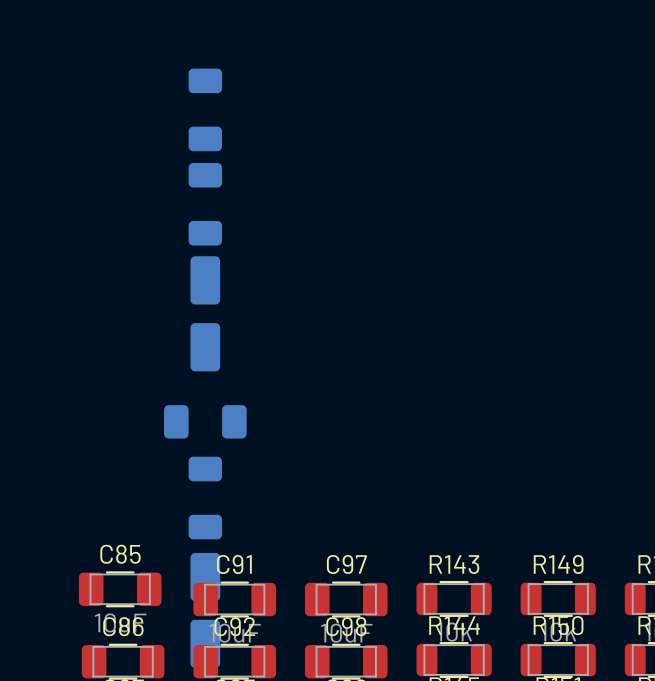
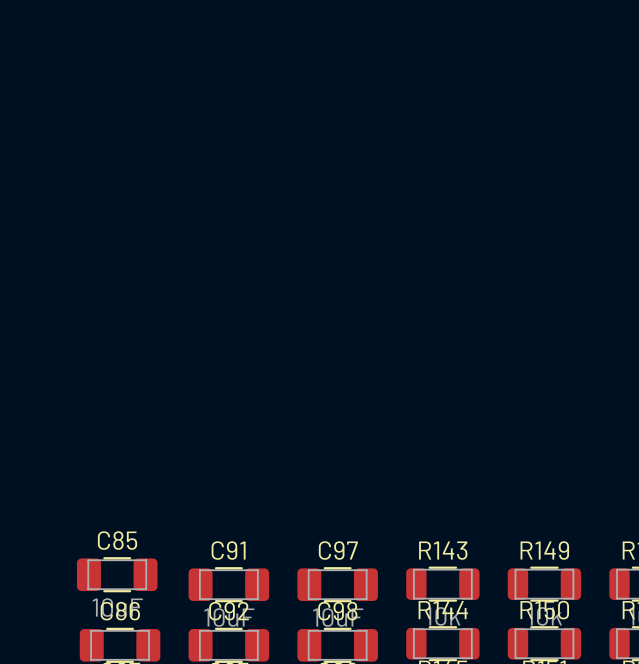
part: (205, 109) -> none
part: (205, 204) -> none
part: (205, 313) -> none
part: (205, 421) -> none
part: (205, 498) -> none
part: (205, 610) -> none

